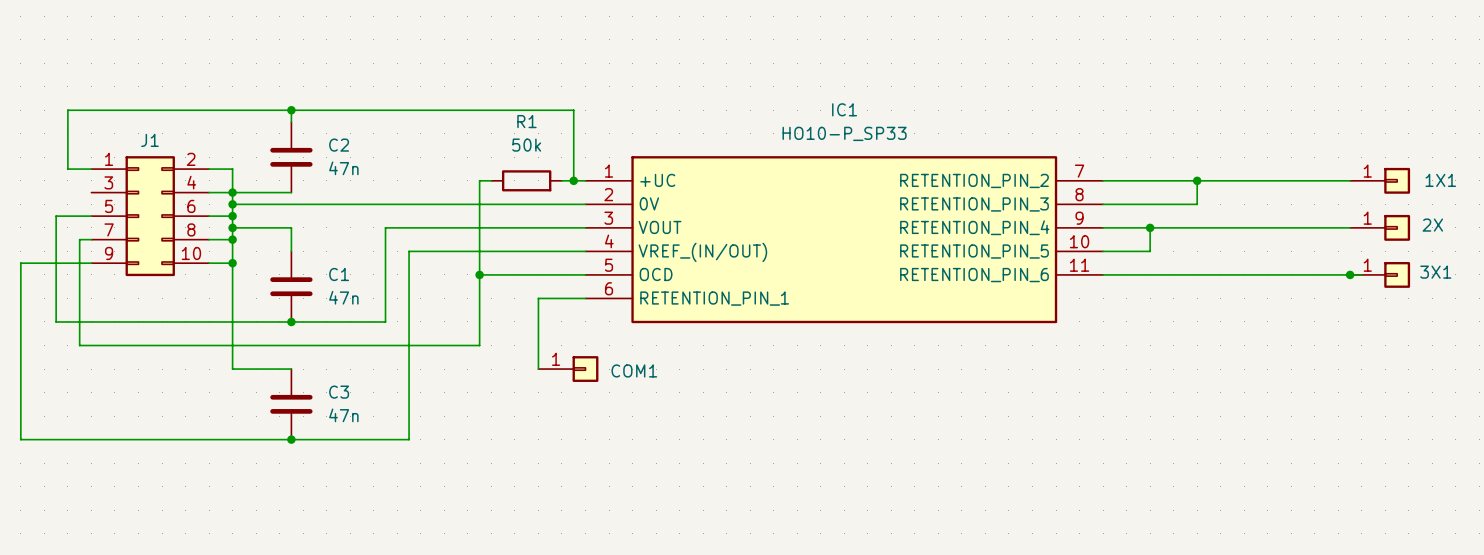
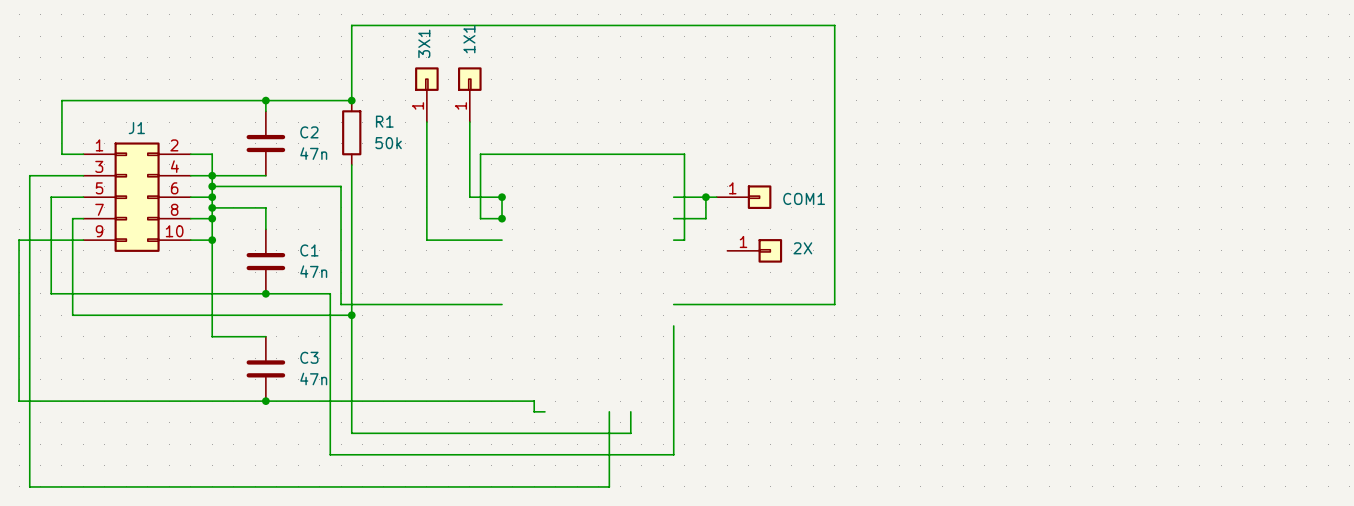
wire: (385, 110) (573, 110) (573, 180) -> (351, 100) (351, 25) (834, 25) (834, 304) (673, 304)
junction: none -> (351, 100)
R1 name position: R1 (526, 121) -> R1 (384, 121)
wire: none -> (426, 122) (426, 240) (502, 240)
wire: none -> (469, 122) (469, 197) (502, 197) (502, 218) (480, 218) (480, 154) (684, 154) (684, 240) (673, 240)
wire: (491, 180) (479, 180) (479, 345) (385, 345) -> none
R1 rotation: 0° (526, 180) -> 90° clockwise (351, 132)
R1 position: (526, 180) -> (351, 132)
wire: (561, 180) (585, 180) -> none
junction: (573, 180) -> none
wire: (1103, 180) (1350, 180) -> none
wire: (1197, 180) (1197, 204) (1103, 204) -> none
junction: (1197, 180) -> none
1X1 position: (1380, 180) -> (469, 94)
1X1 rotation: 0° (1397, 180) -> 90° counterclockwise (469, 79)
wire: none -> (83, 175) (29, 175) (29, 486) (609, 486) (609, 411)
wire: (373, 204) (585, 204) -> (341, 186) (341, 304) (502, 304)
junction: none -> (502, 197)
junction: none -> (705, 197)
wire: (385, 227) (585, 227) -> (351, 207) (351, 164)
wire: (1103, 227) (1350, 227) -> none
wire: (1150, 227) (1150, 251) (1103, 251) -> none
junction: (1150, 227) -> none
part: 2X (1380, 227) -> none
junction: none -> (502, 218)
IC1: HO10-P_SP33 (844, 239) -> none
wire: (585, 251) (409, 251) (409, 439) -> (544, 411) (534, 411) (534, 401) (373, 401)
wire: (479, 274) (585, 274) -> none
junction: (479, 274) -> none
part: none -> 2X (754, 250)
wire: (1103, 274) (1361, 274) -> none
junction: (1350, 274) -> none
3X1 position: (1380, 274) -> (426, 94)
3X1 rotation: 0° (1397, 274) -> 90° counterclockwise (426, 79)
wire: (585, 298) (538, 298) (538, 369) -> none
wire: (361, 321) (385, 321) -> (630, 411) (630, 433) (351, 433) (351, 293)
wire: none -> (330, 293) (330, 454) (673, 454) (673, 325)
junction: none -> (351, 315)
COM1 position: (568, 369) -> (744, 197)

